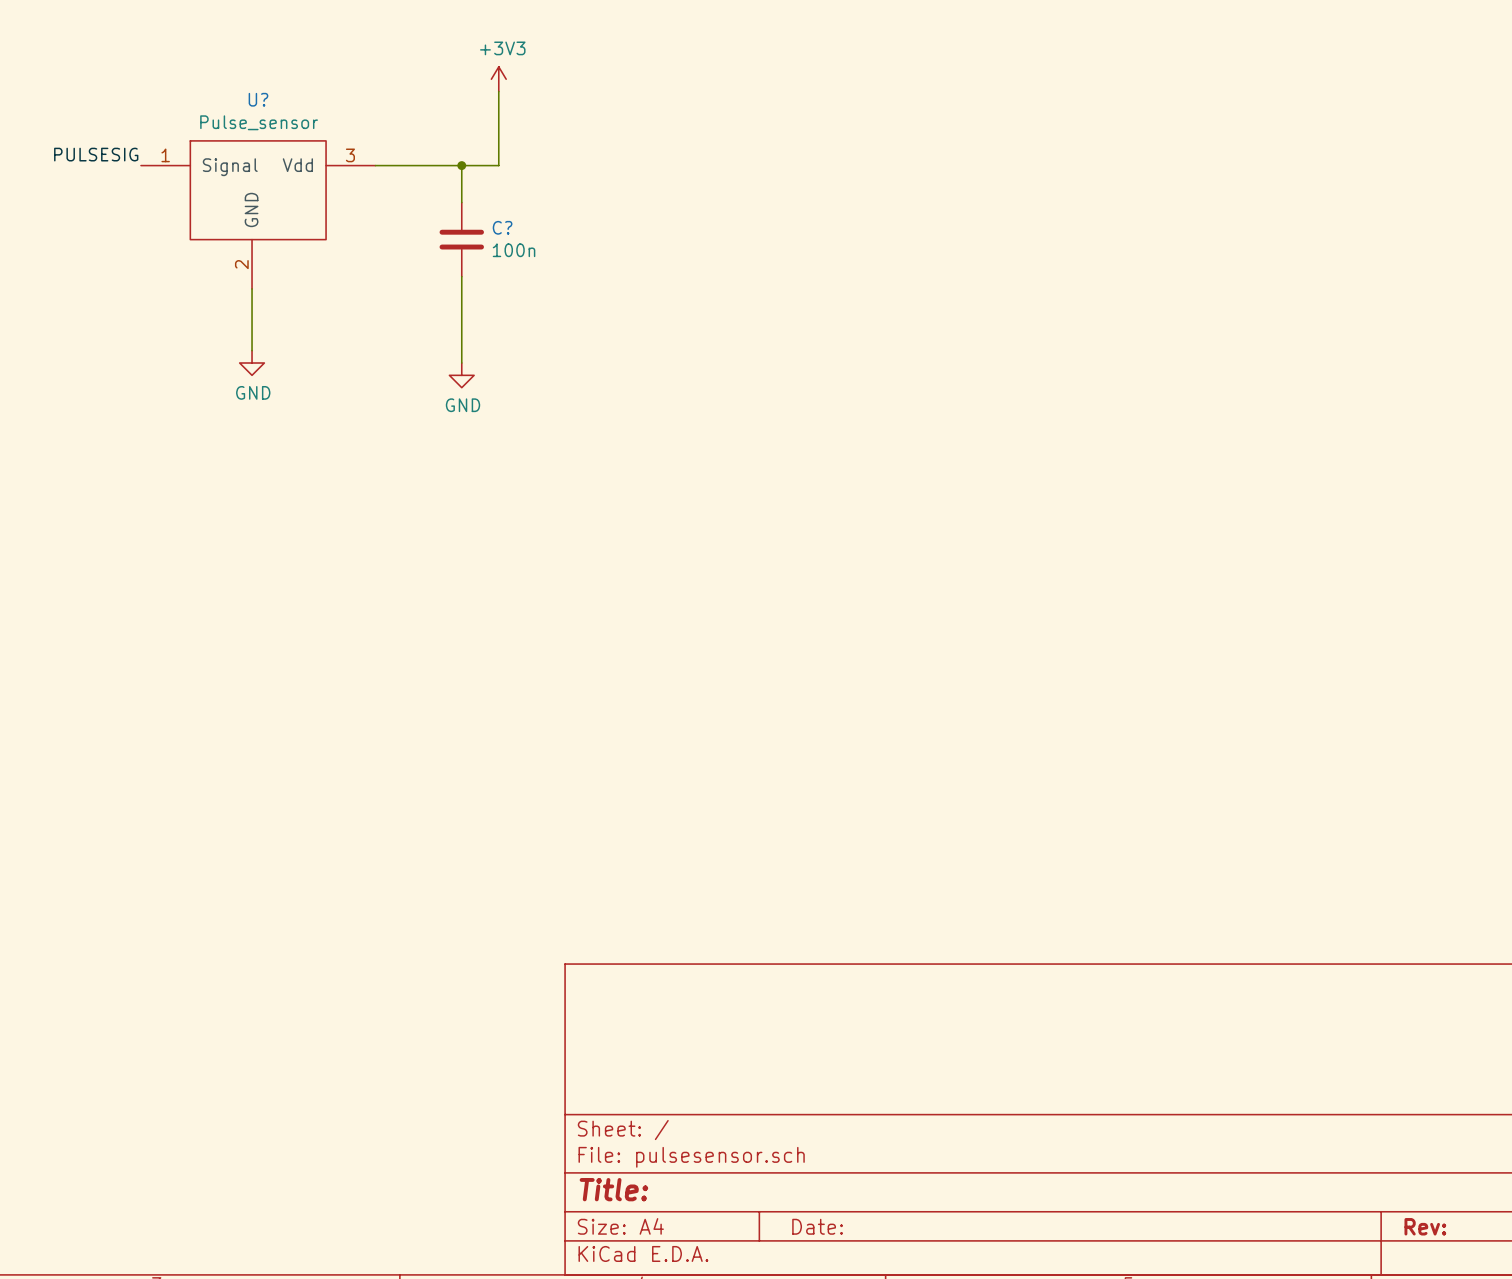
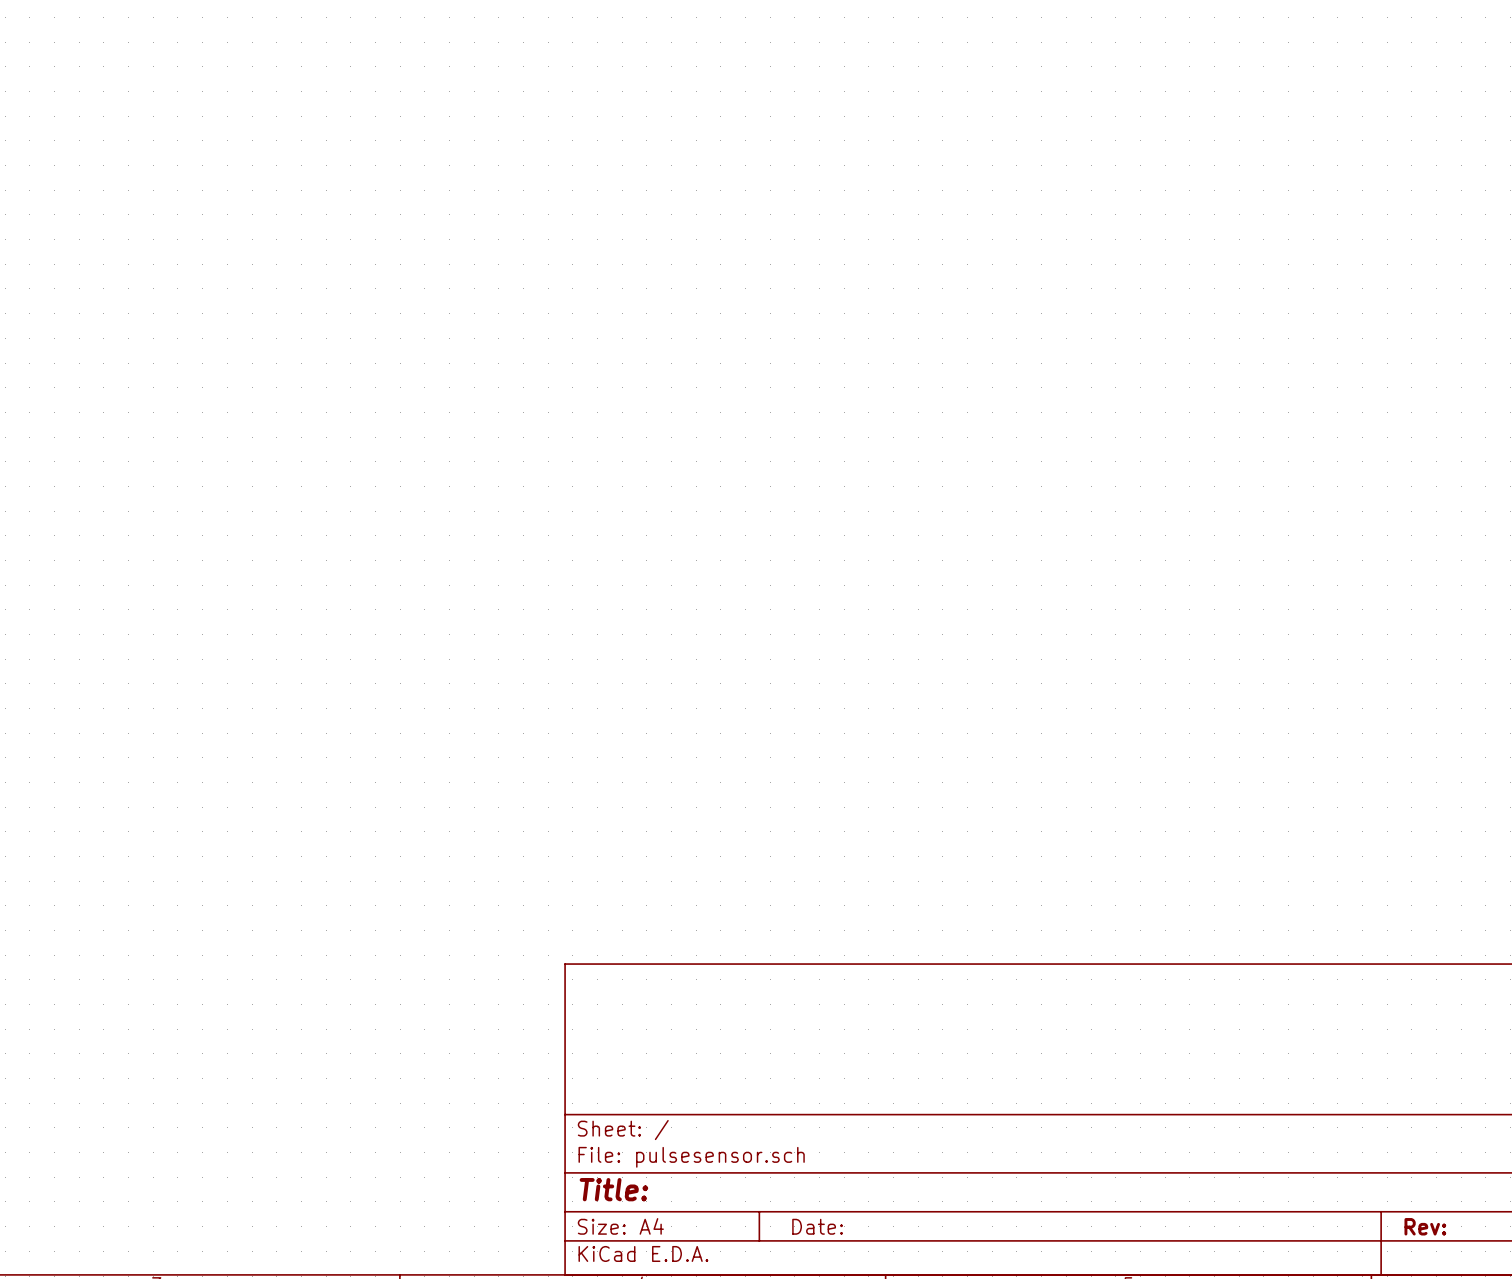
power symbol: +3V3 (498, 79) -> none
wire: (498, 91) (498, 165) (375, 165) -> none
label: PULSESIG (96, 154) -> none
wire: (461, 165) (461, 202) -> none
junction: (461, 165) -> none
U?: Pulse_sensor (258, 214) -> none
C?: 100n (461, 239) -> none
wire: (461, 276) (461, 363) -> none
wire: (252, 288) (252, 350) -> none
power symbol: GND (252, 363) -> none
power symbol: GND (461, 375) -> none

